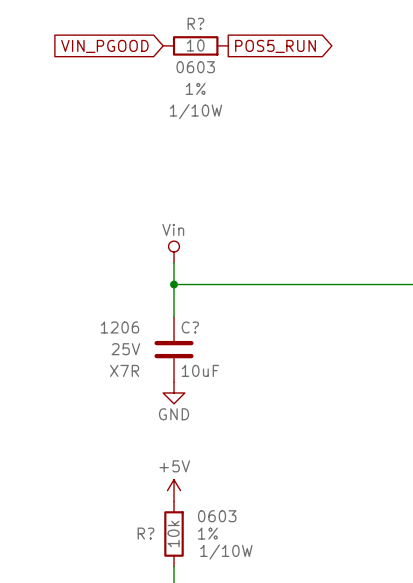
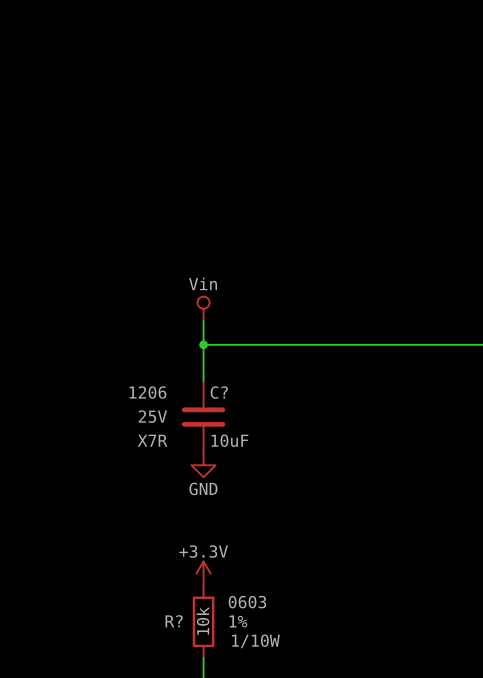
R?: 10 (195, 45) -> none
global label: VIN_PGOOD (104, 46) -> none
global label: POS5_RUN (275, 46) -> none
power symbol: +5V (174, 490) -> +3.3V (203, 573)

